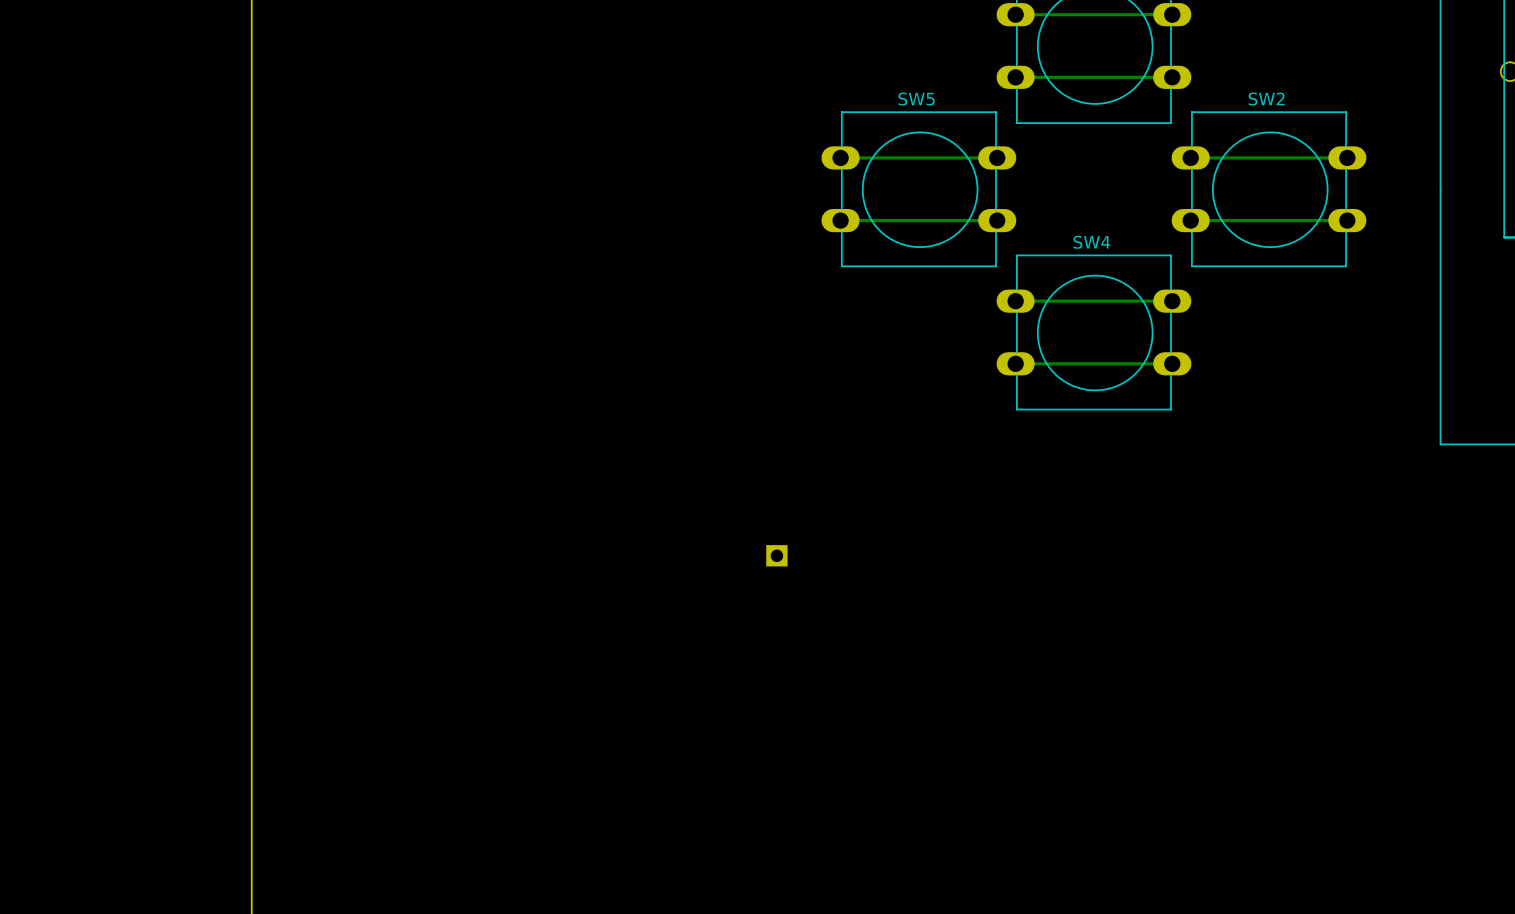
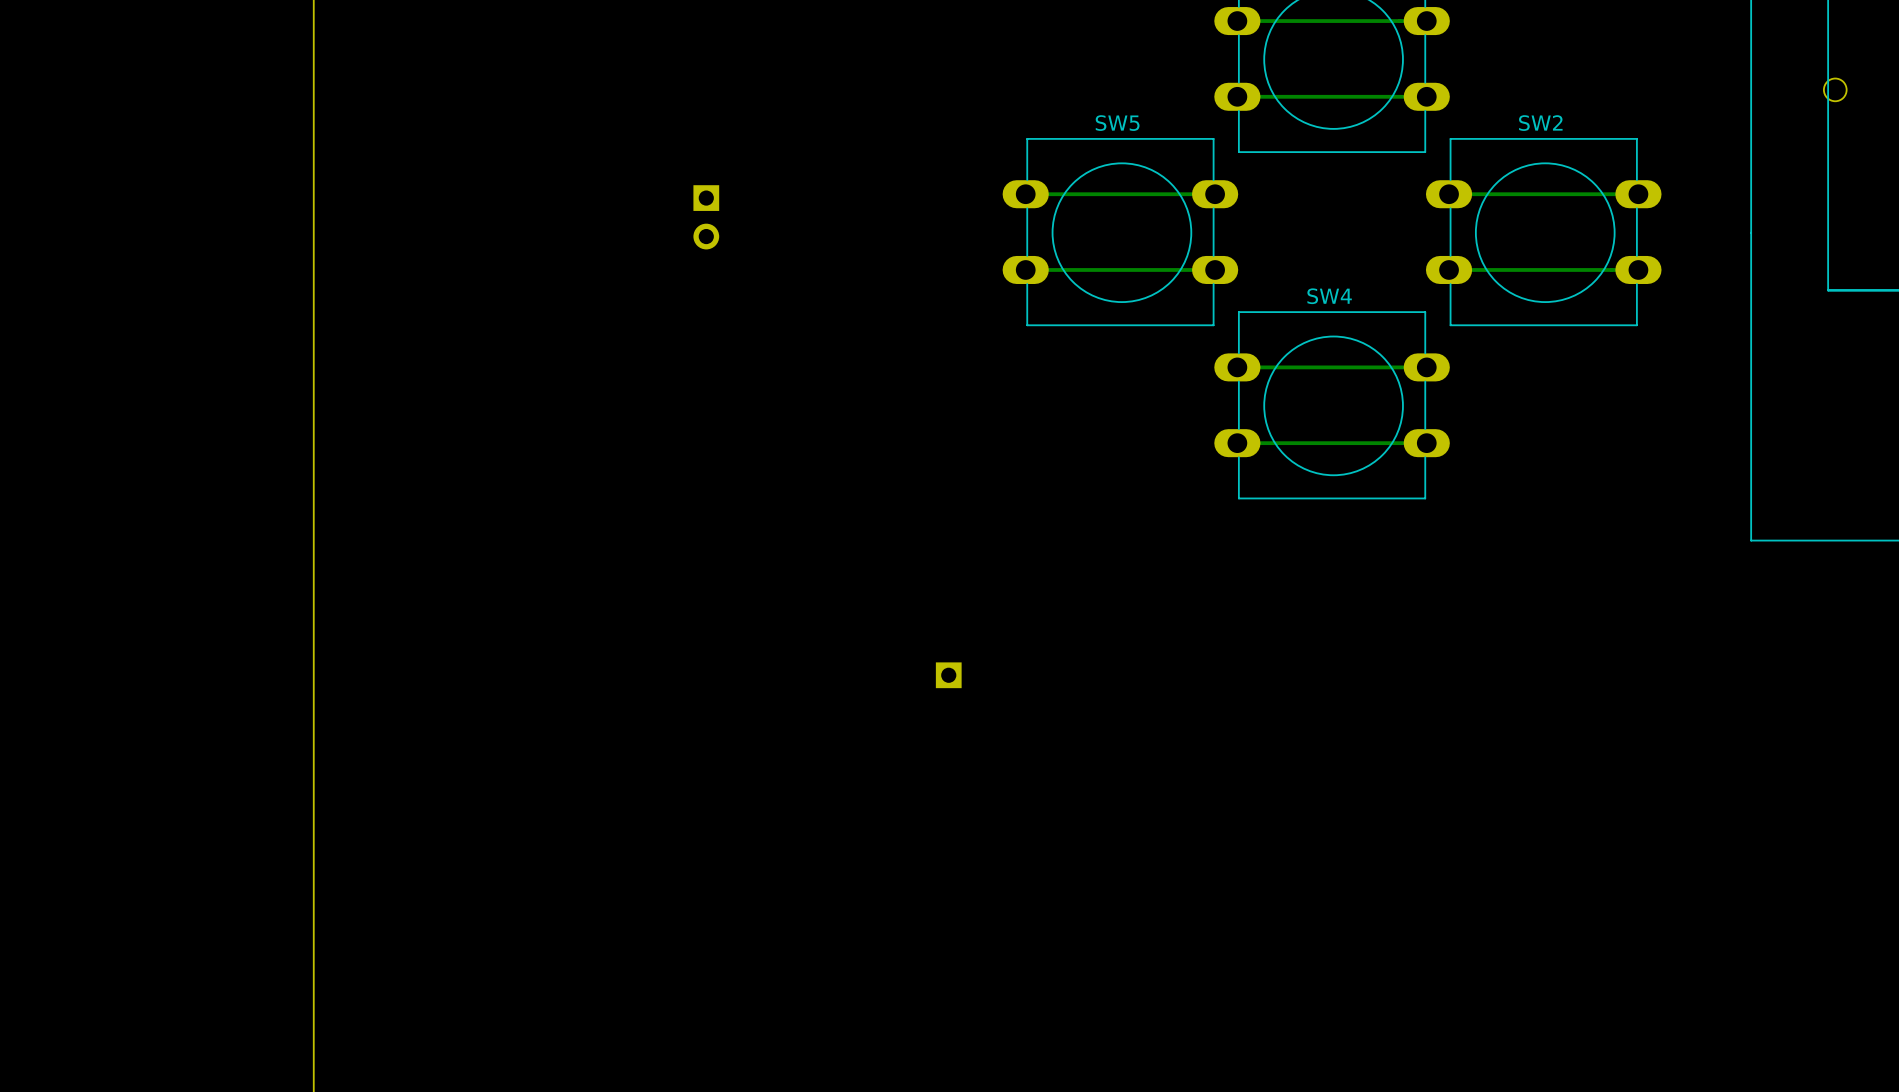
part: none -> (706, 217)

